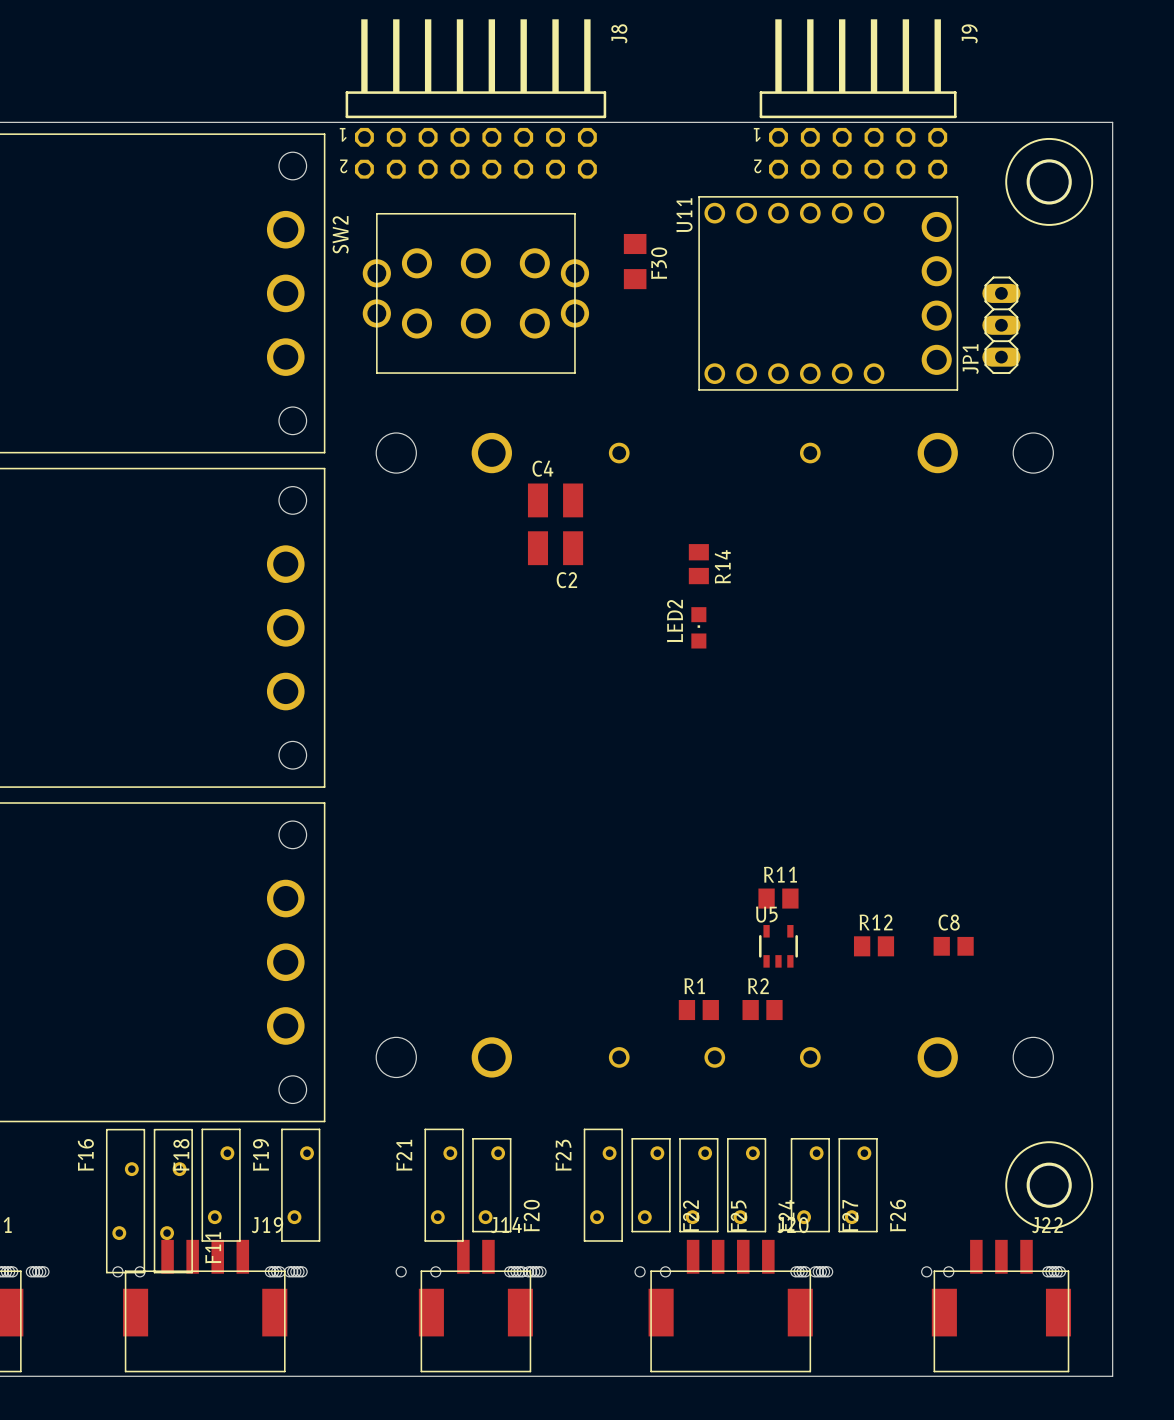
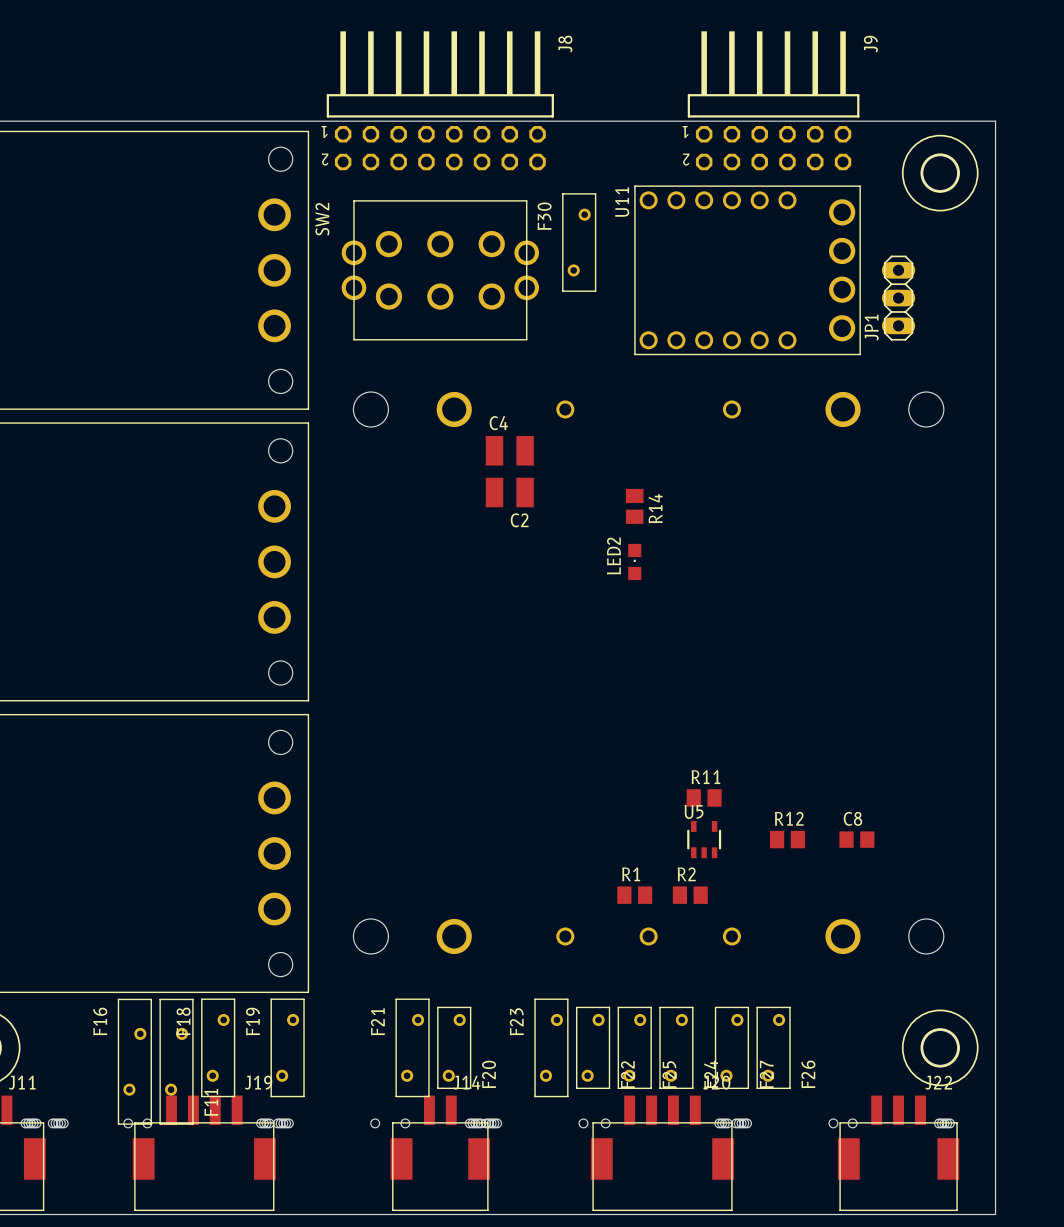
F30 footprint: [623, 233, 647, 290] -> [562, 193, 597, 292]
F30 name position: F30 (659, 263) -> F30 (544, 216)

